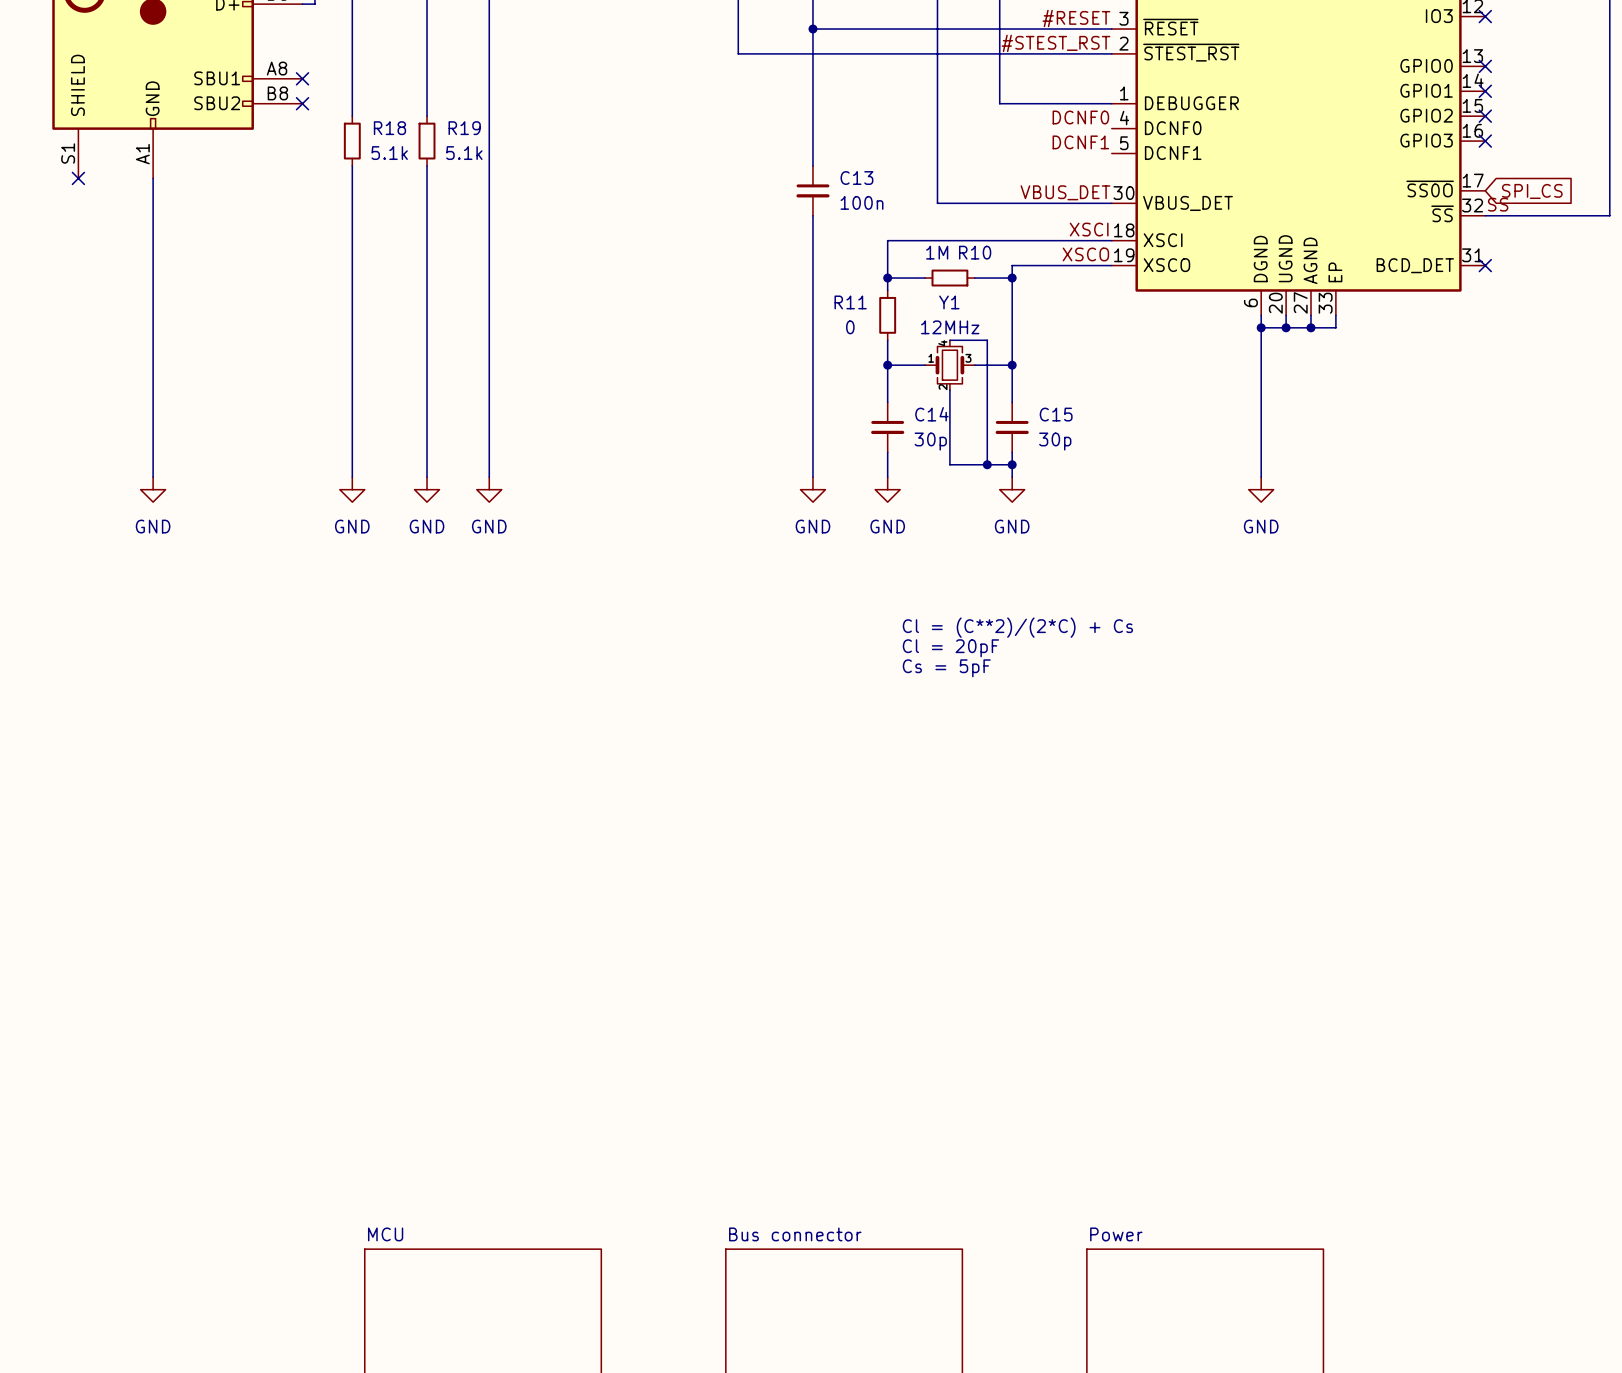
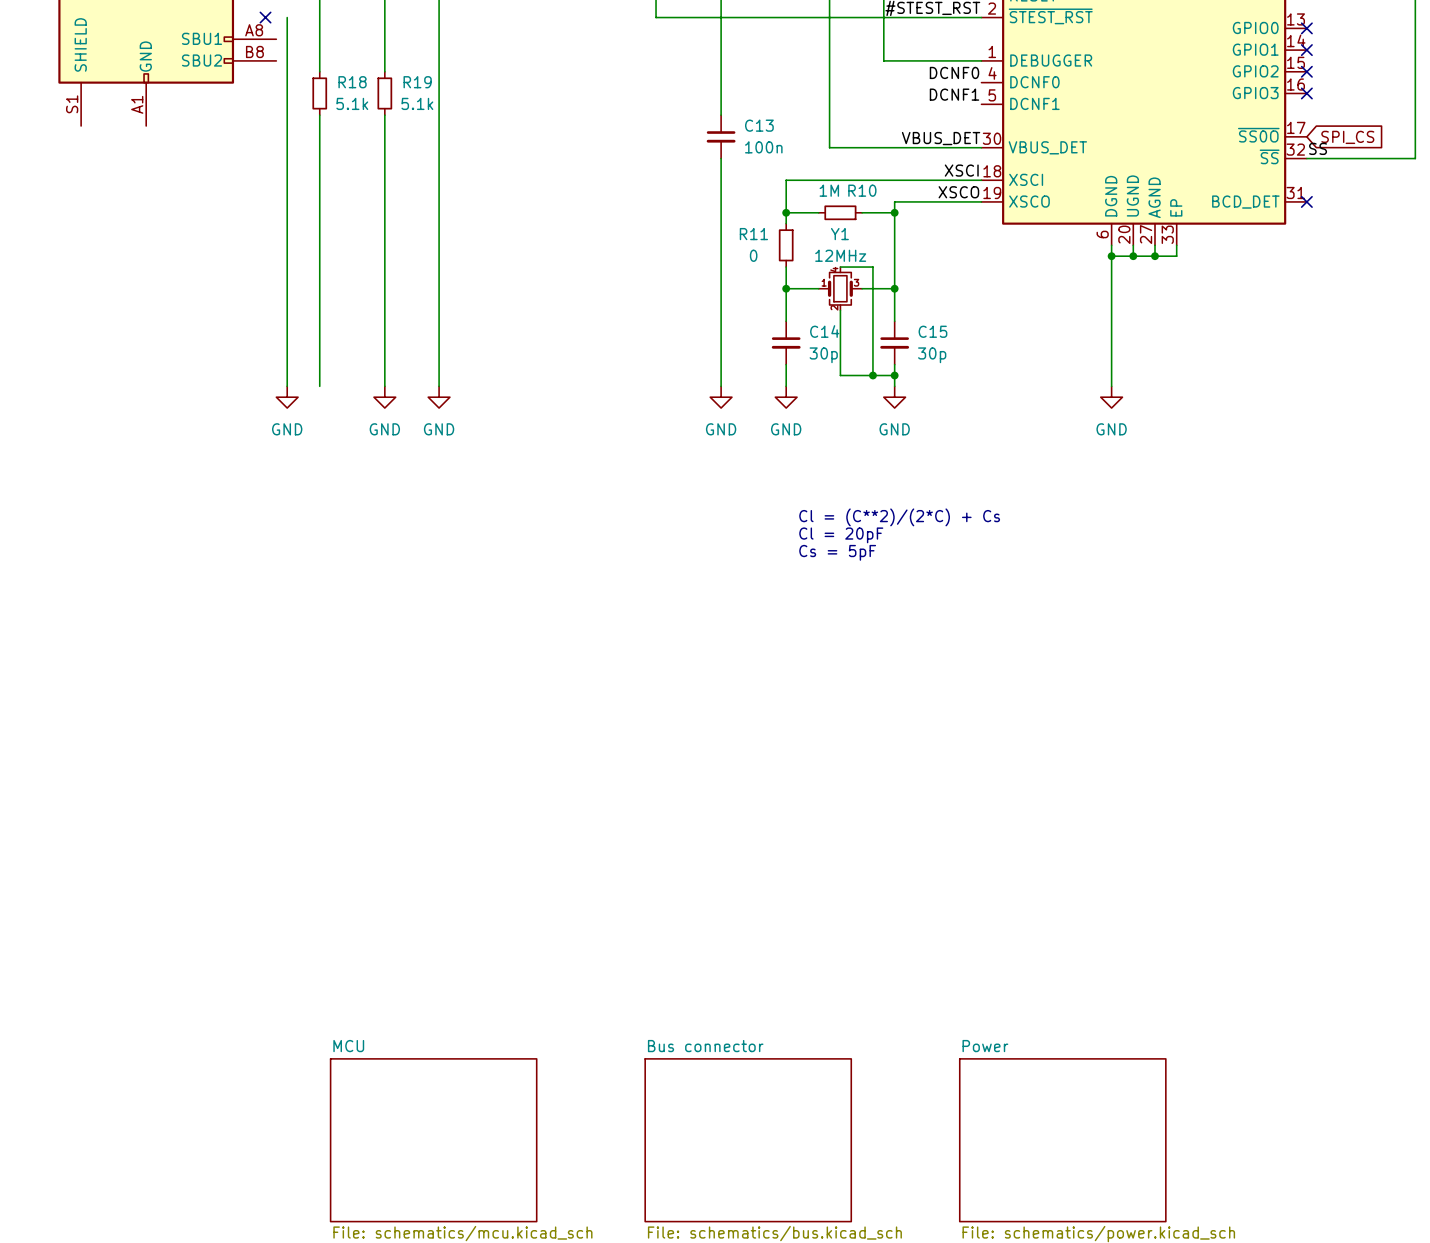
no-connect mark: none -> (265, 17)
wire: none -> (287, 17) (287, 386)
no-connect mark: (302, 78) -> none
no-connect mark: (302, 103) -> none
no-connect mark: (78, 178) -> none
wire: (153, 178) (153, 477) -> none
power symbol: GND (153, 489) -> none
power symbol position: GND (352, 489) -> GND (287, 397)

